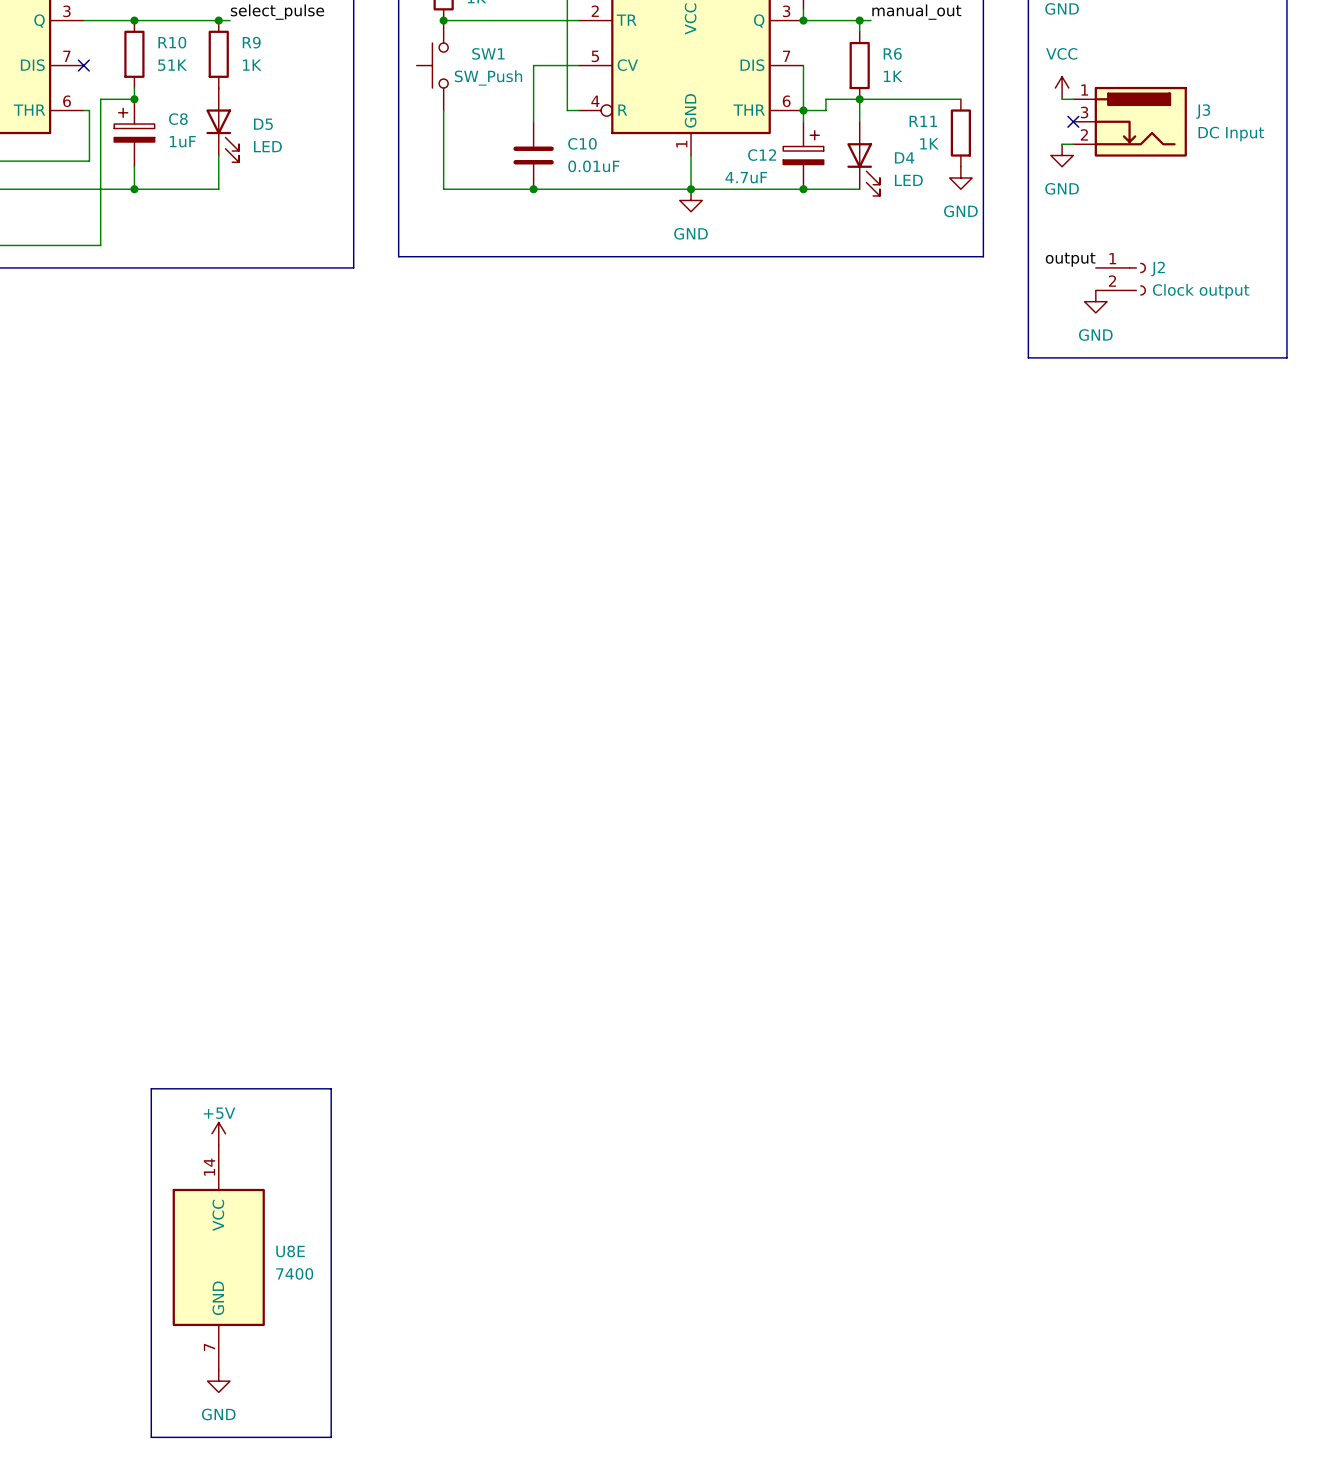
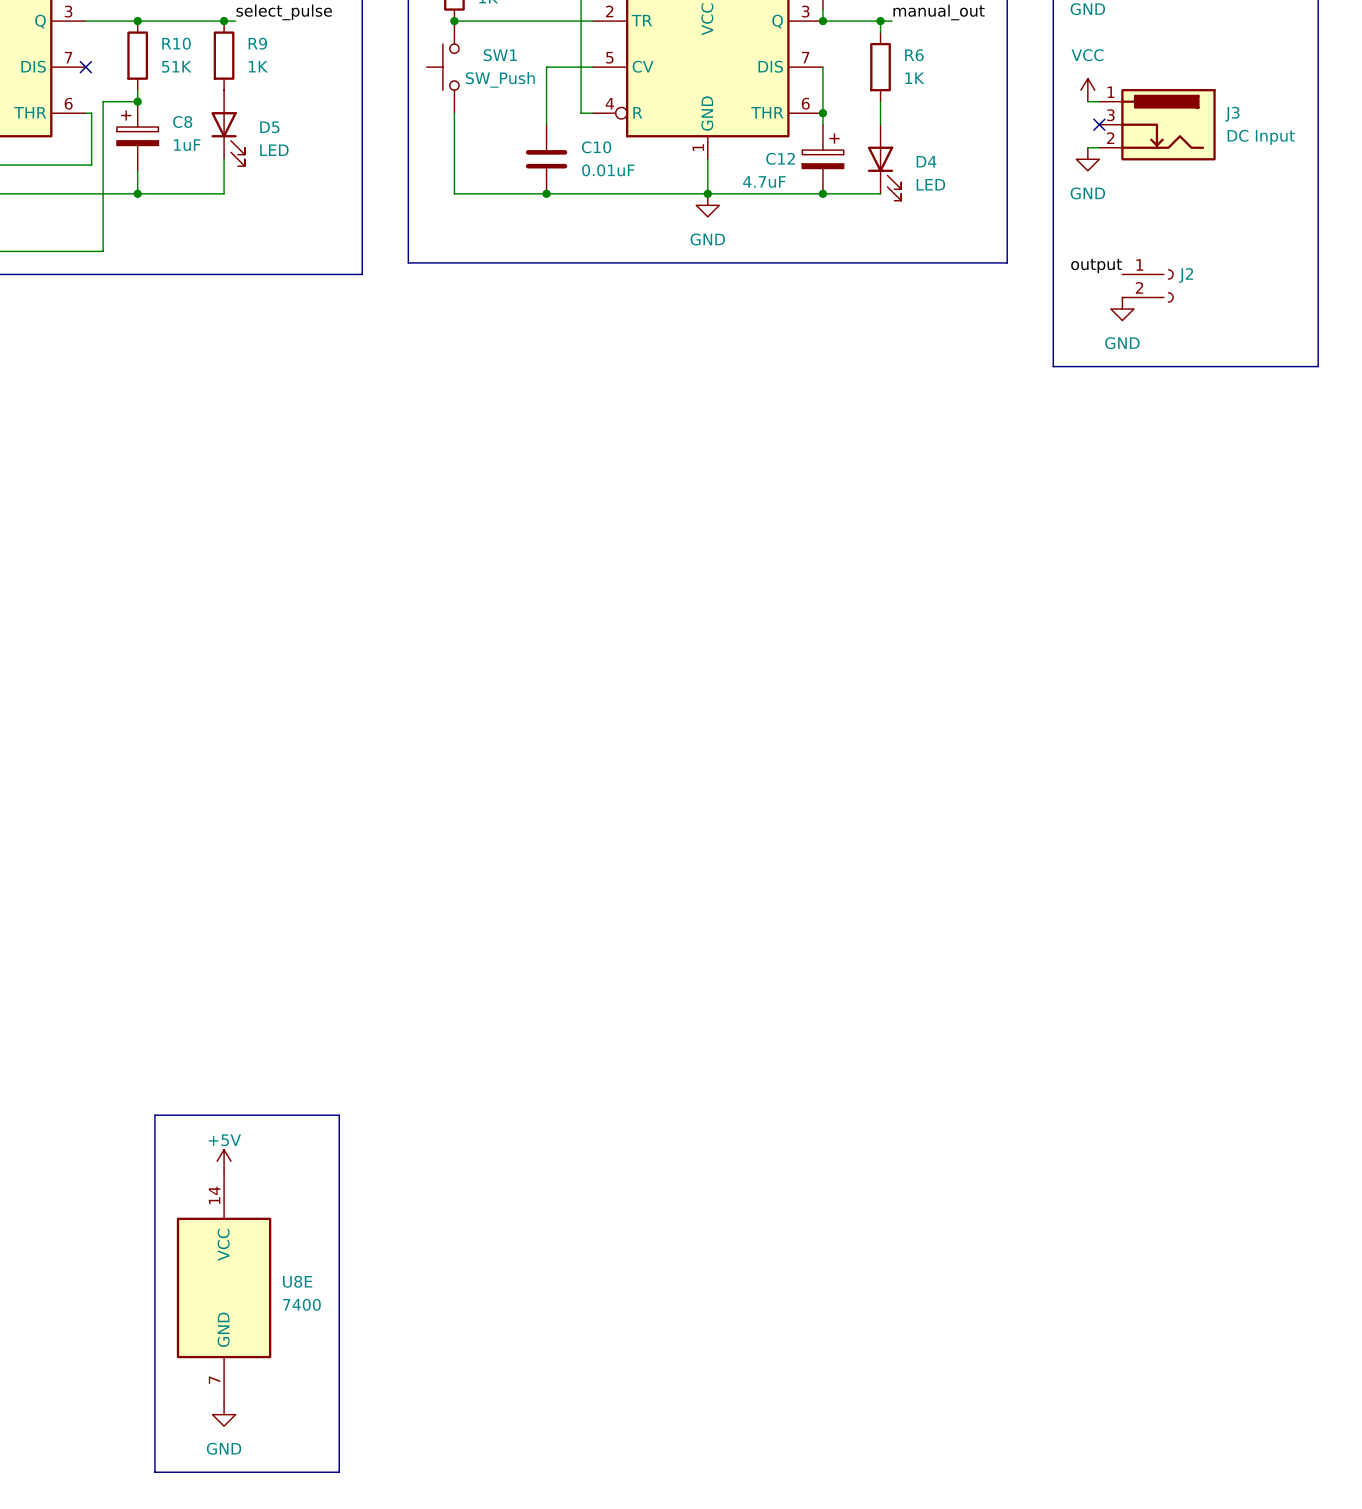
junction: (859, 99) -> none
wire: (960, 99) (825, 99) (825, 110) (803, 110) -> none
R11: 1K (960, 133) -> none
power symbol: GND (960, 177) -> none
J2 value: Clock output (1201, 291) -> none

